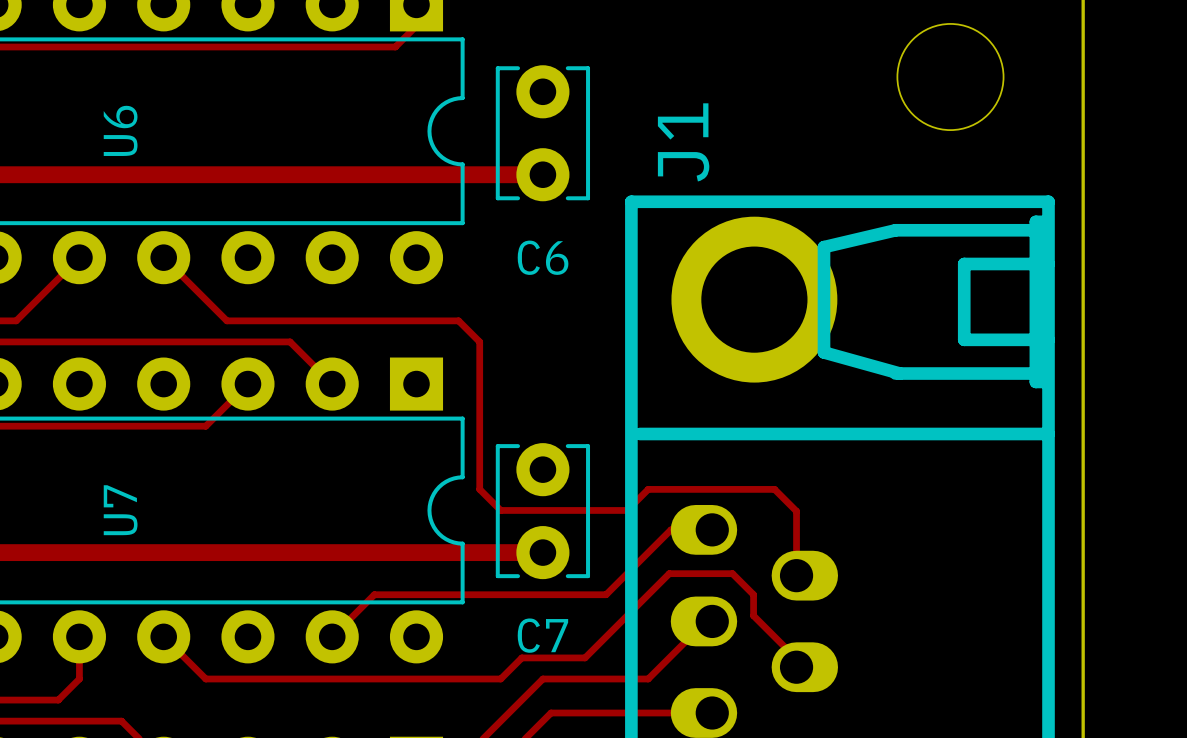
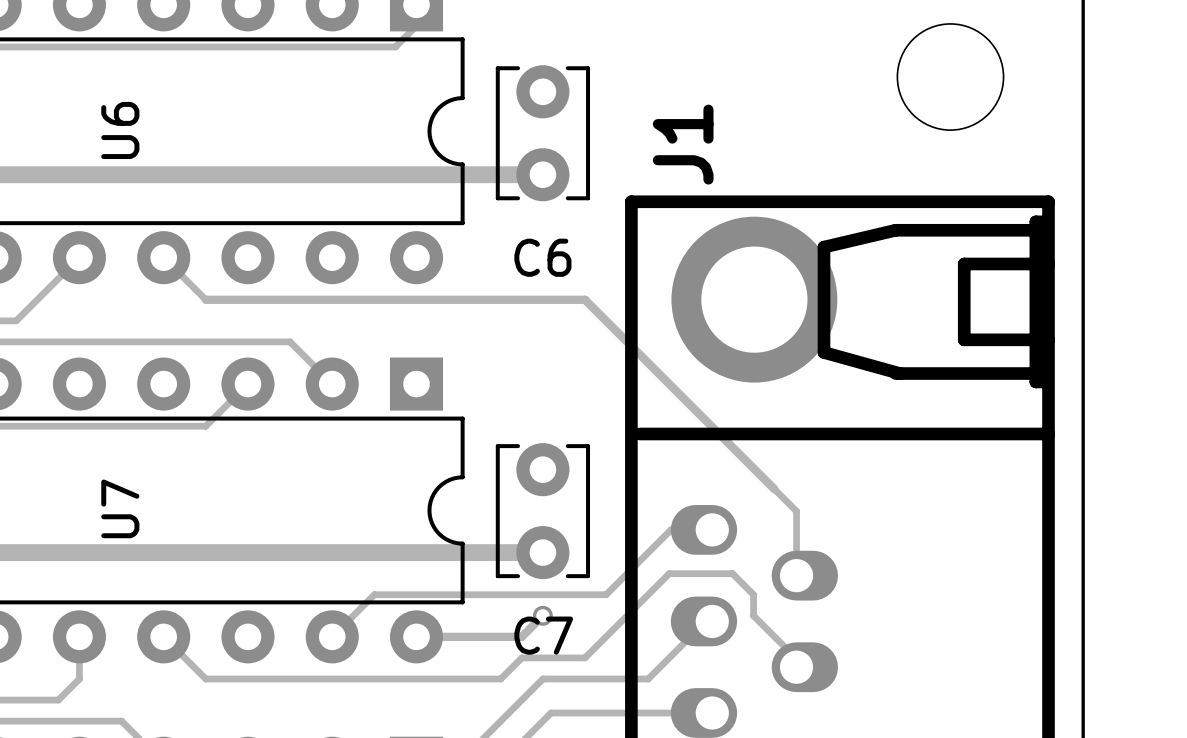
track: (205, 299) (226, 320) (458, 320) (479, 341) (479, 489) (500, 510) (627, 510) (648, 489) (774, 489) -> (205, 299) (585, 299) (774, 489)
track: none -> (542, 615) (521, 636) (416, 636)
via: none -> (542, 615)

